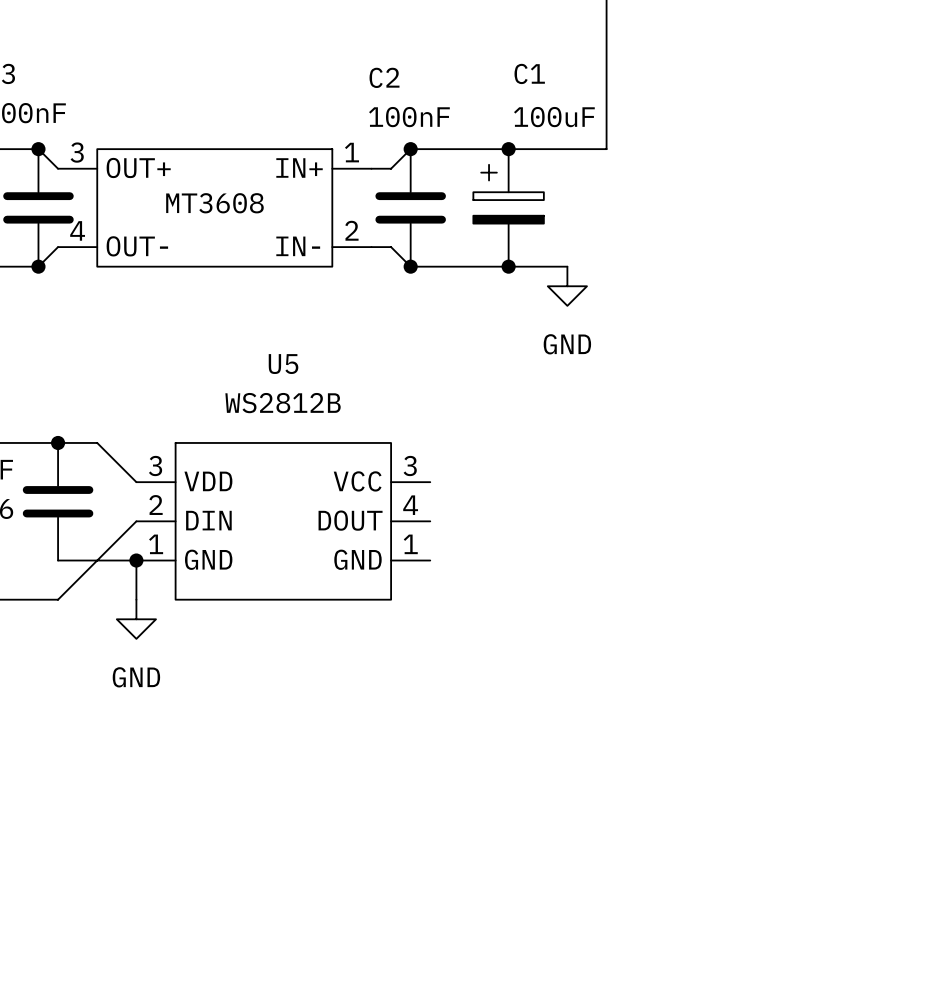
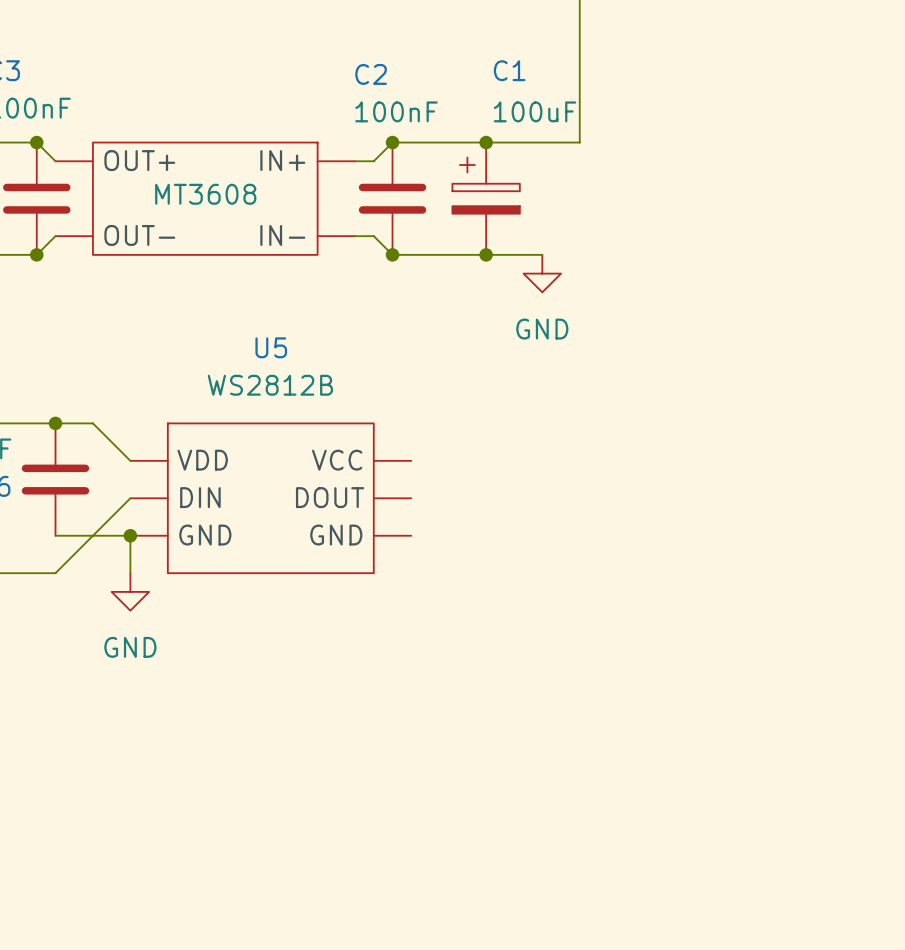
part pin number: 3 (77, 152) -> none
part pin number: 1 (351, 152) -> none
part pin number: 4 (77, 230) -> none
part pin number: 2 (351, 230) -> none
U5 pin number: 3 (155, 466) -> none
U5 pin number: 3 (410, 466) -> none
U5 pin number: 2 (156, 505) -> none
U5 pin number: 4 (410, 505) -> none
U5 pin number: 1 (156, 544) -> none
U5 pin number: 1 (410, 544) -> none

